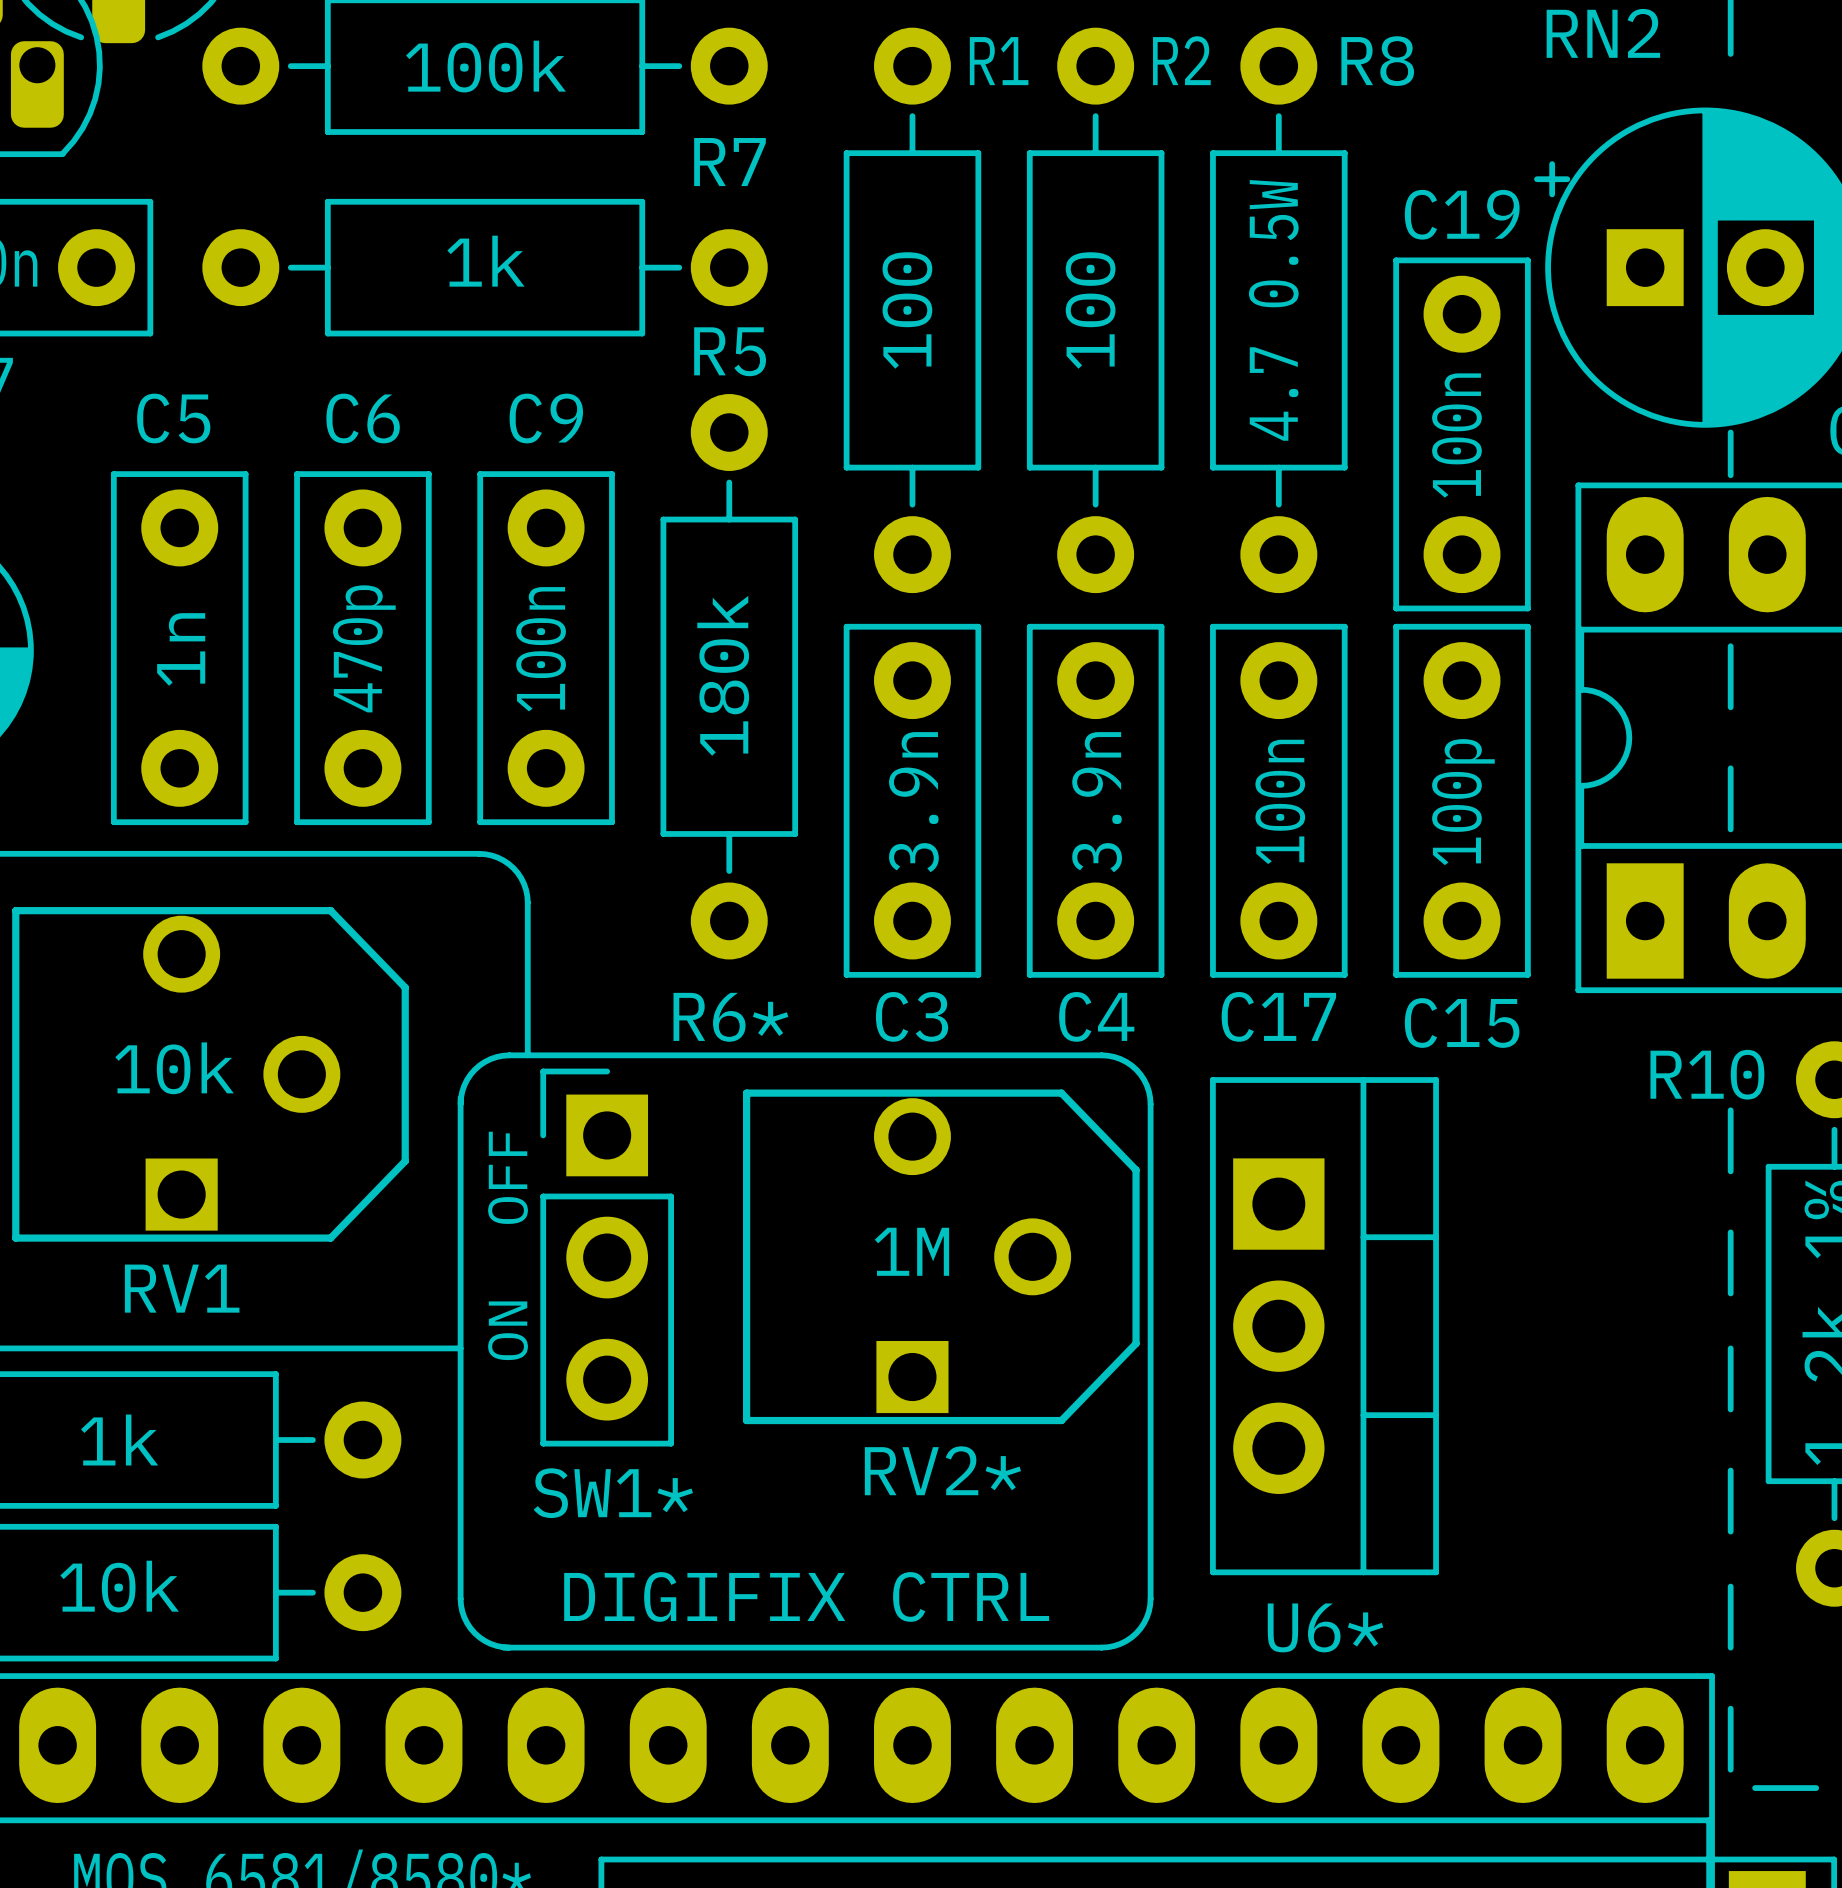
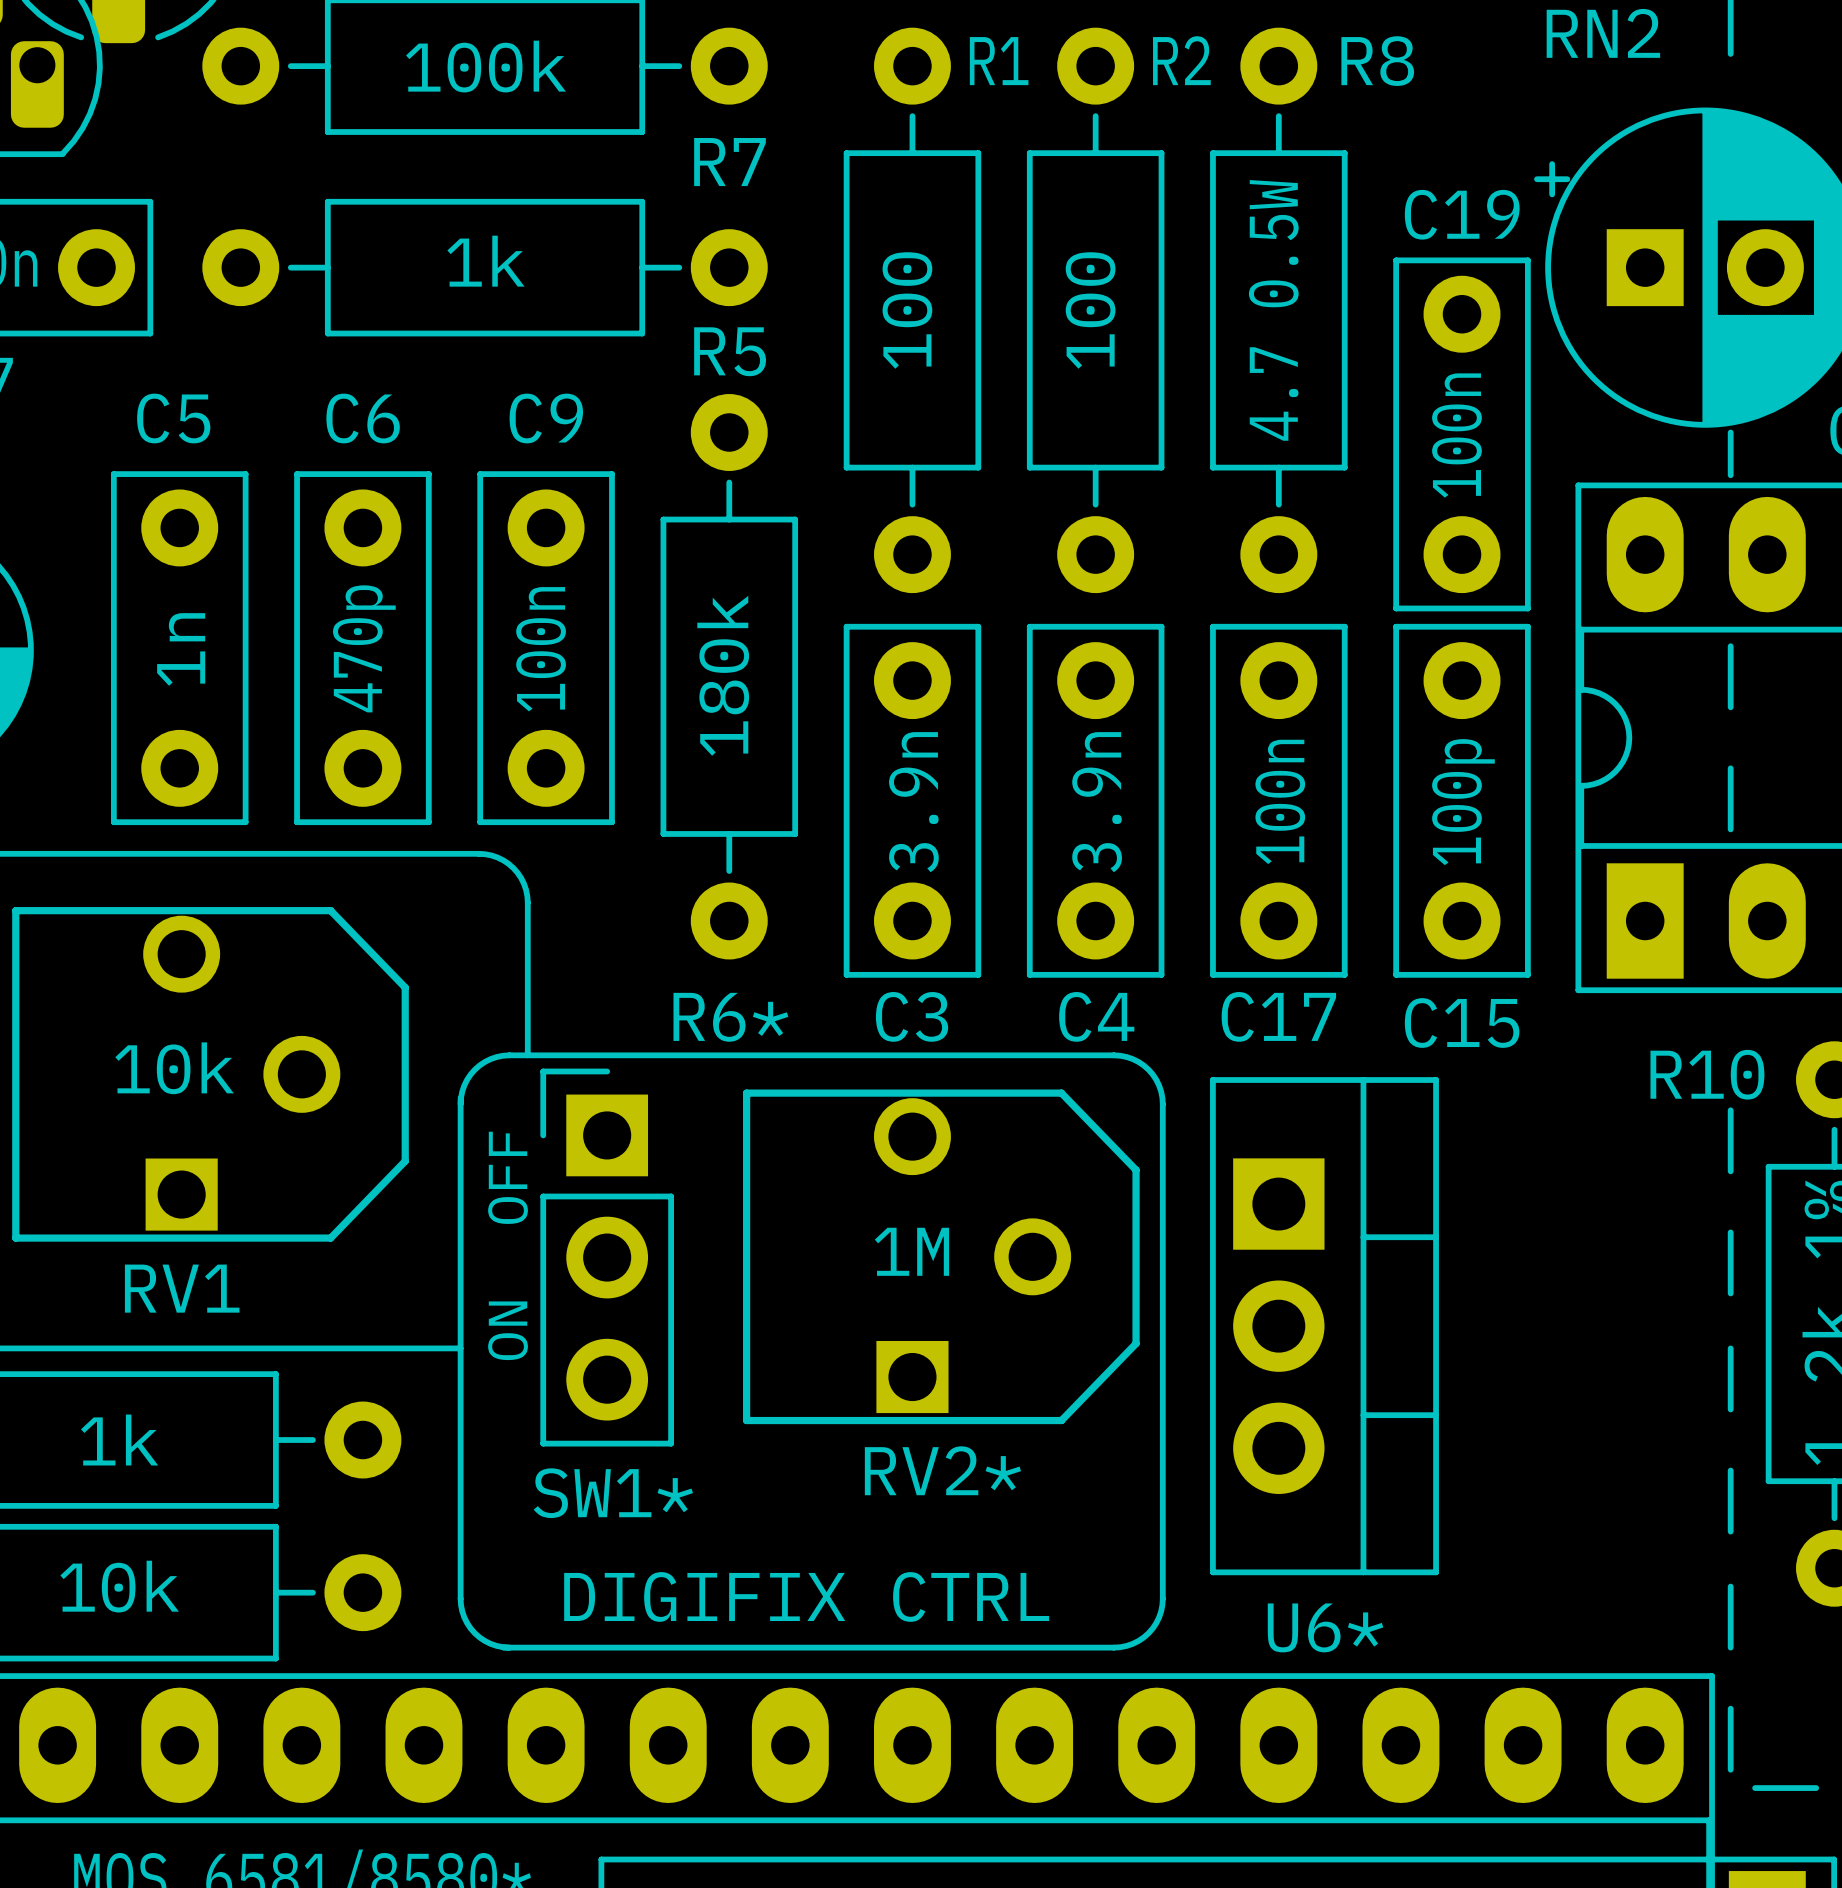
line: (1101, 1055) (1120, 1059) (1136, 1069) (1146, 1085) (1150, 1104) (1150, 1605) (1144, 1623) (1131, 1637) (1120, 1643) (1101, 1647) -> (1101, 1055) (1126, 1056) (1143, 1065) (1156, 1079) (1161, 1091) (1162, 1104) (1162, 1605) (1156, 1623) (1143, 1637) (1126, 1645) (1101, 1647)

